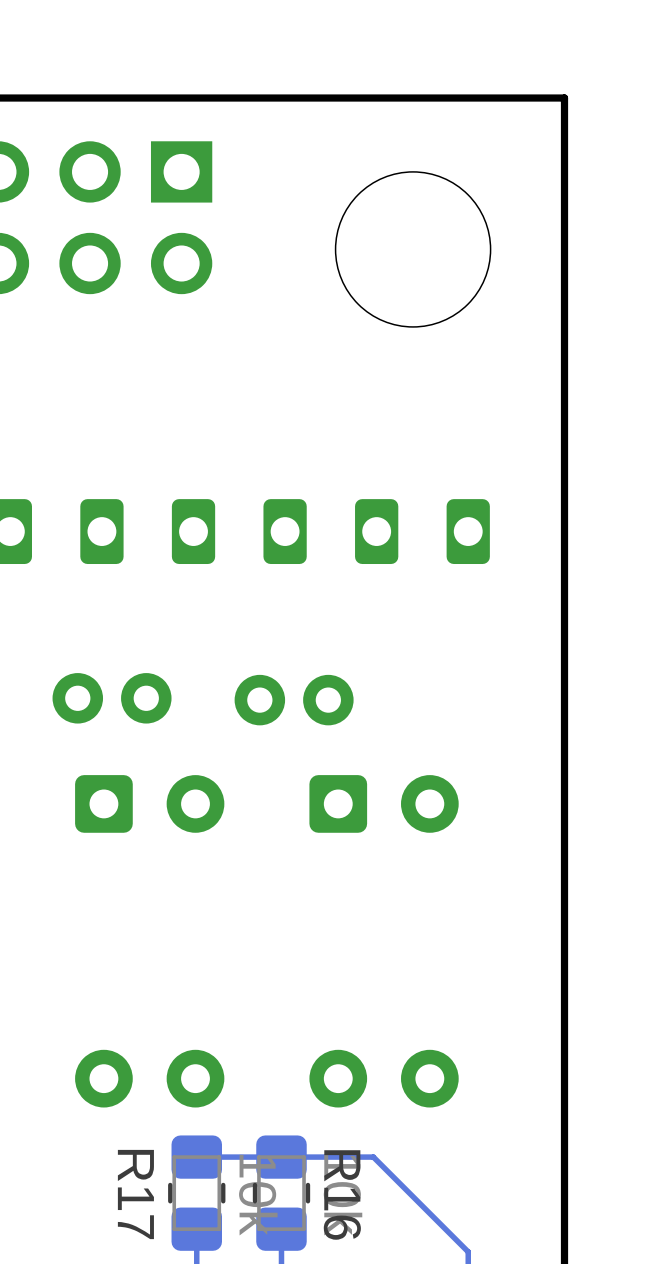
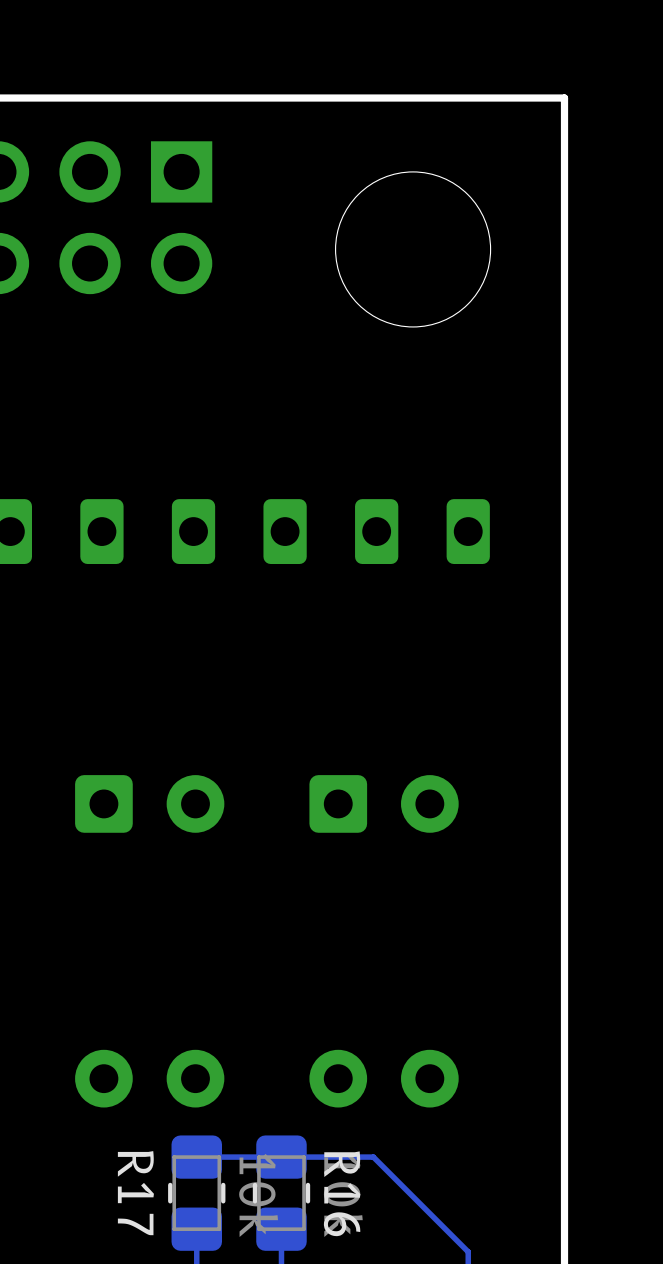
part: (112, 698) -> none
part: (294, 700) -> none

